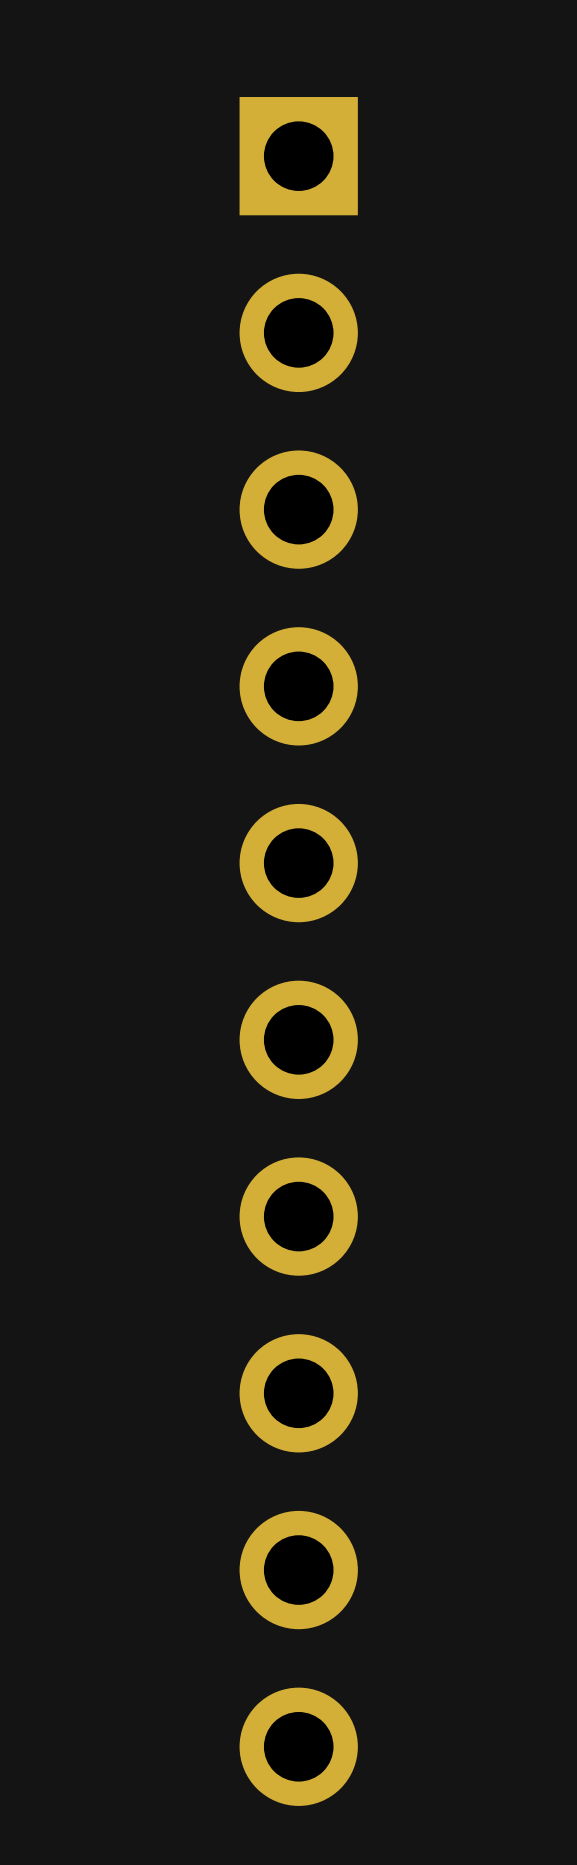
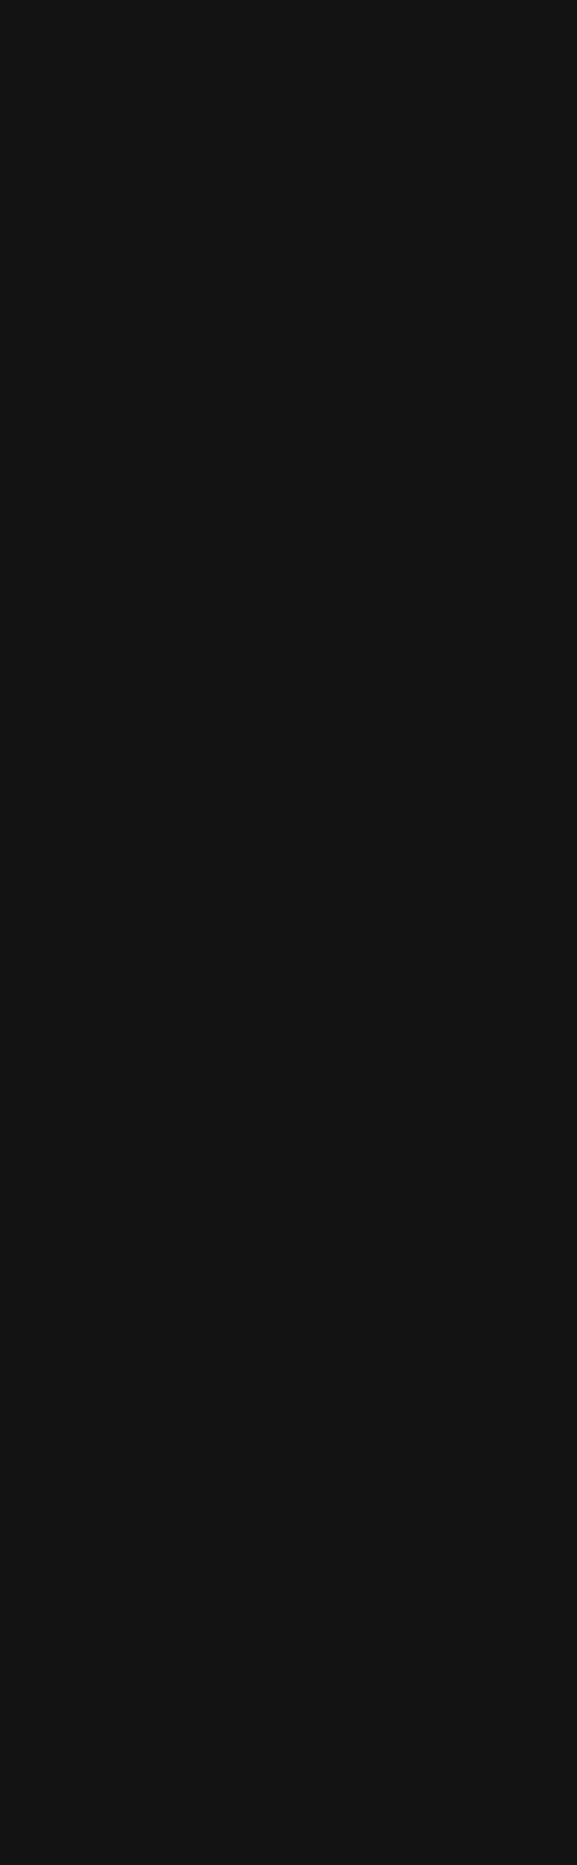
part: (298, 951) -> none

